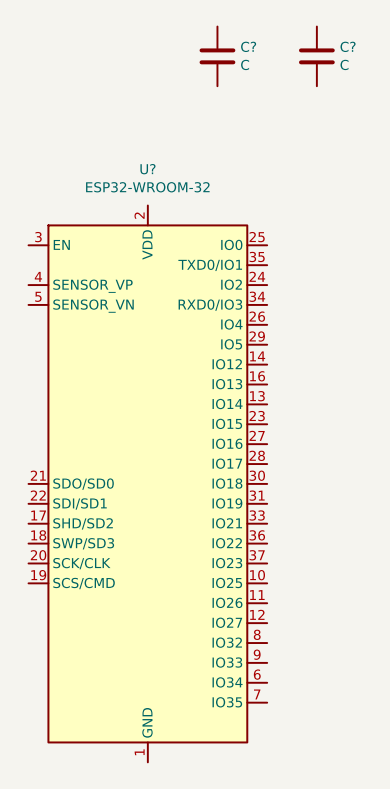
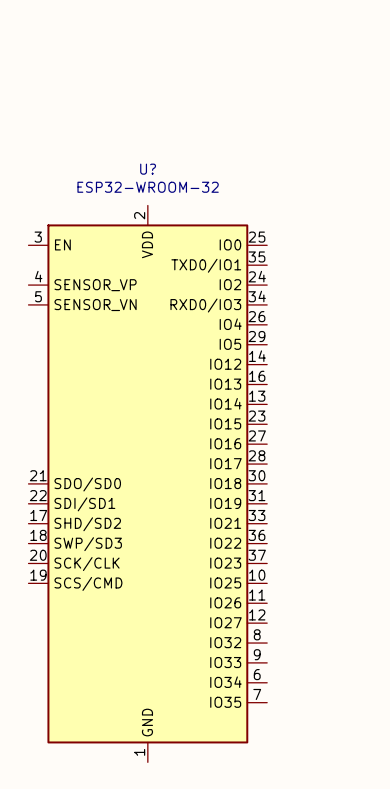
C?: C (217, 56) -> none
C?: C (316, 56) -> none

